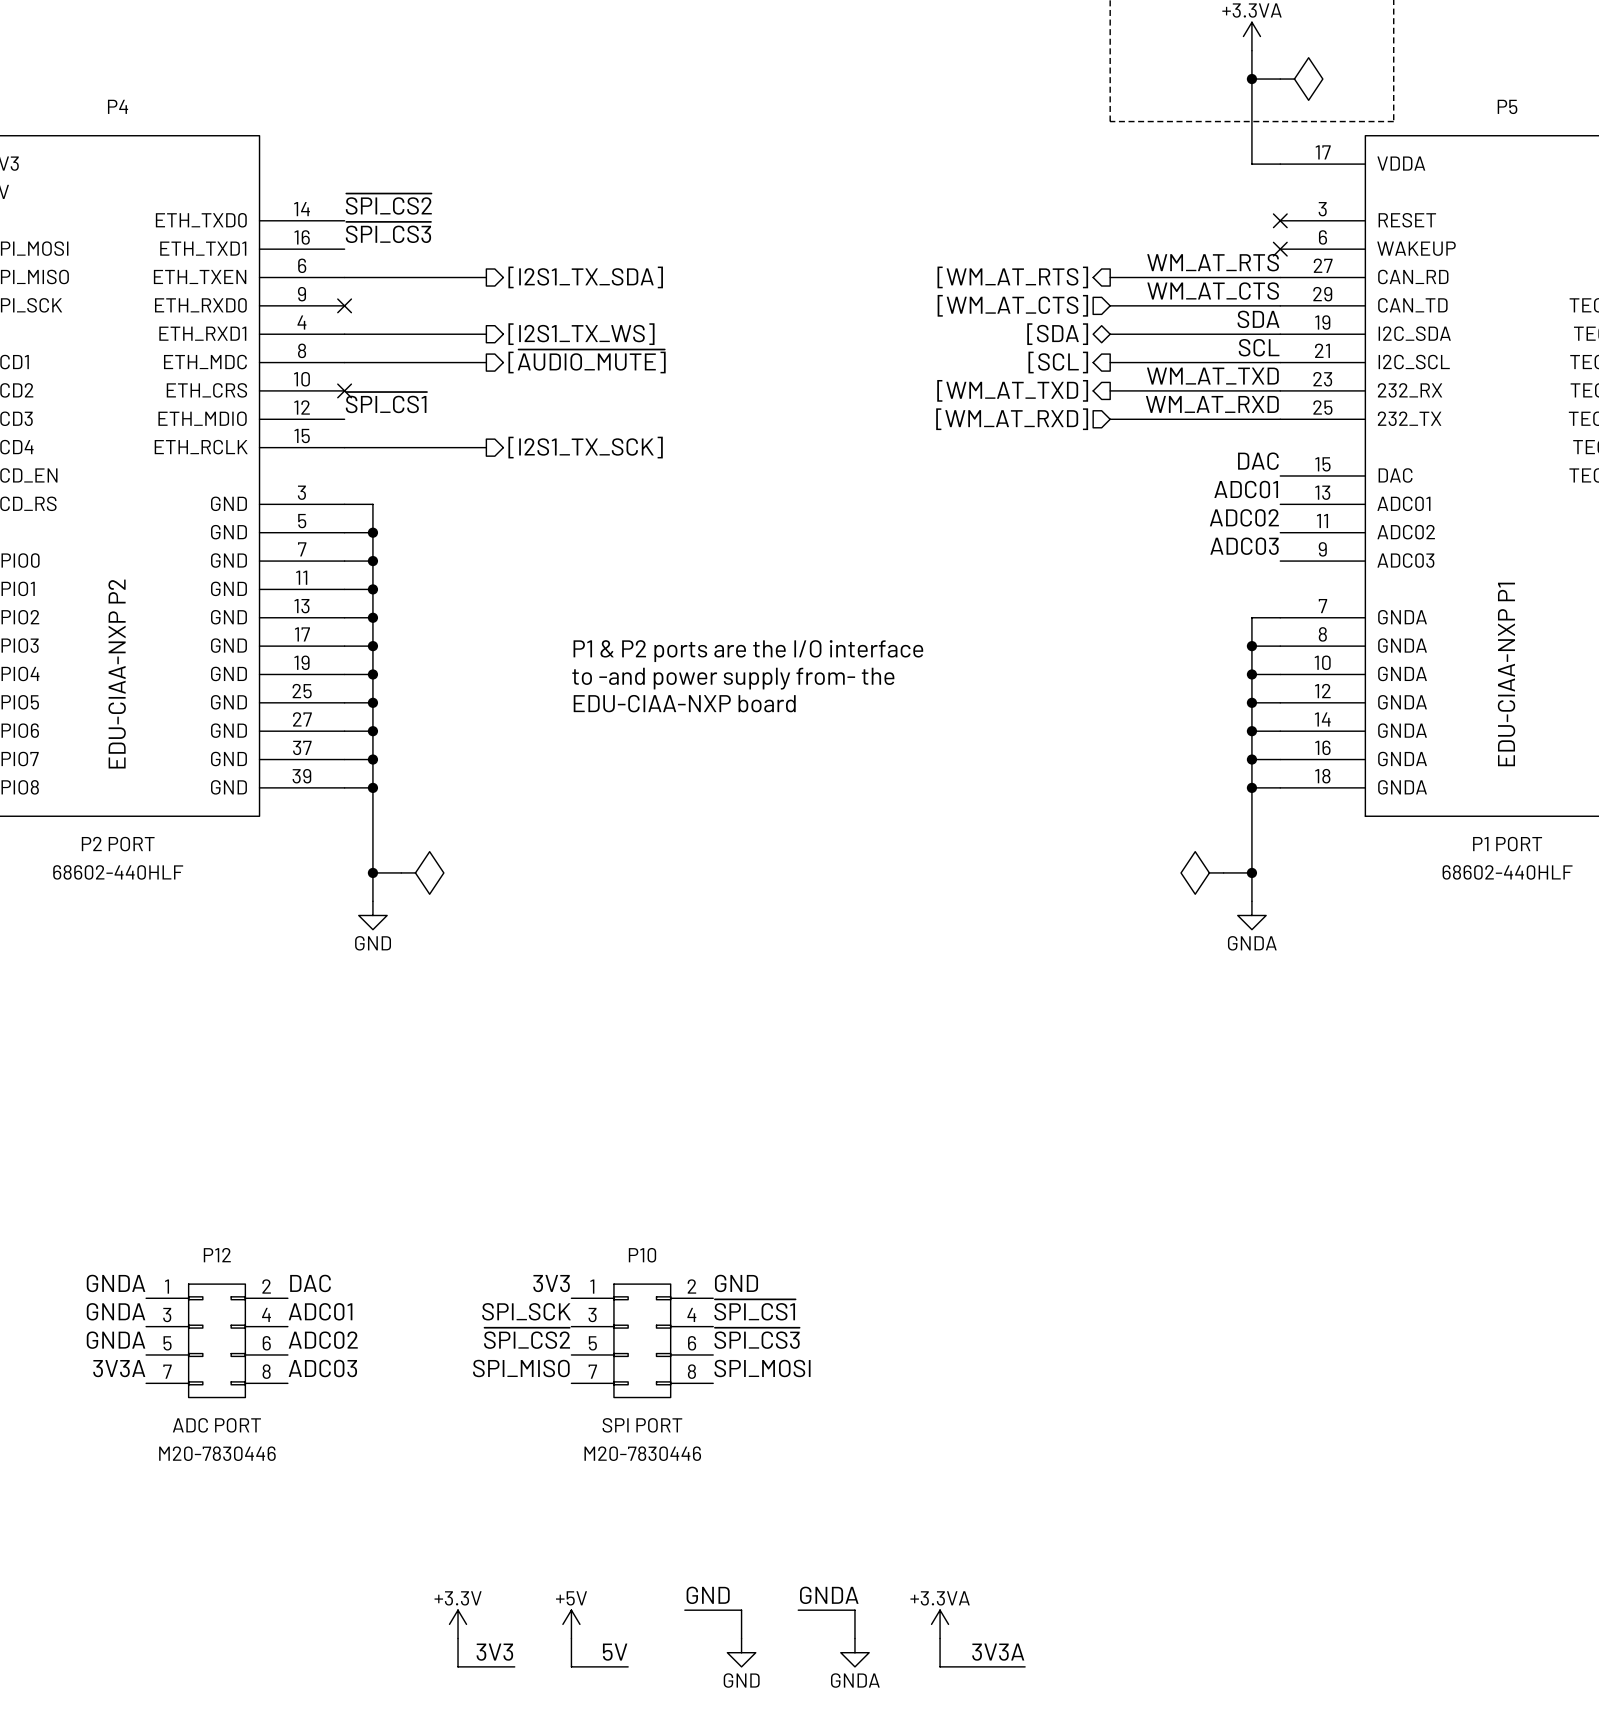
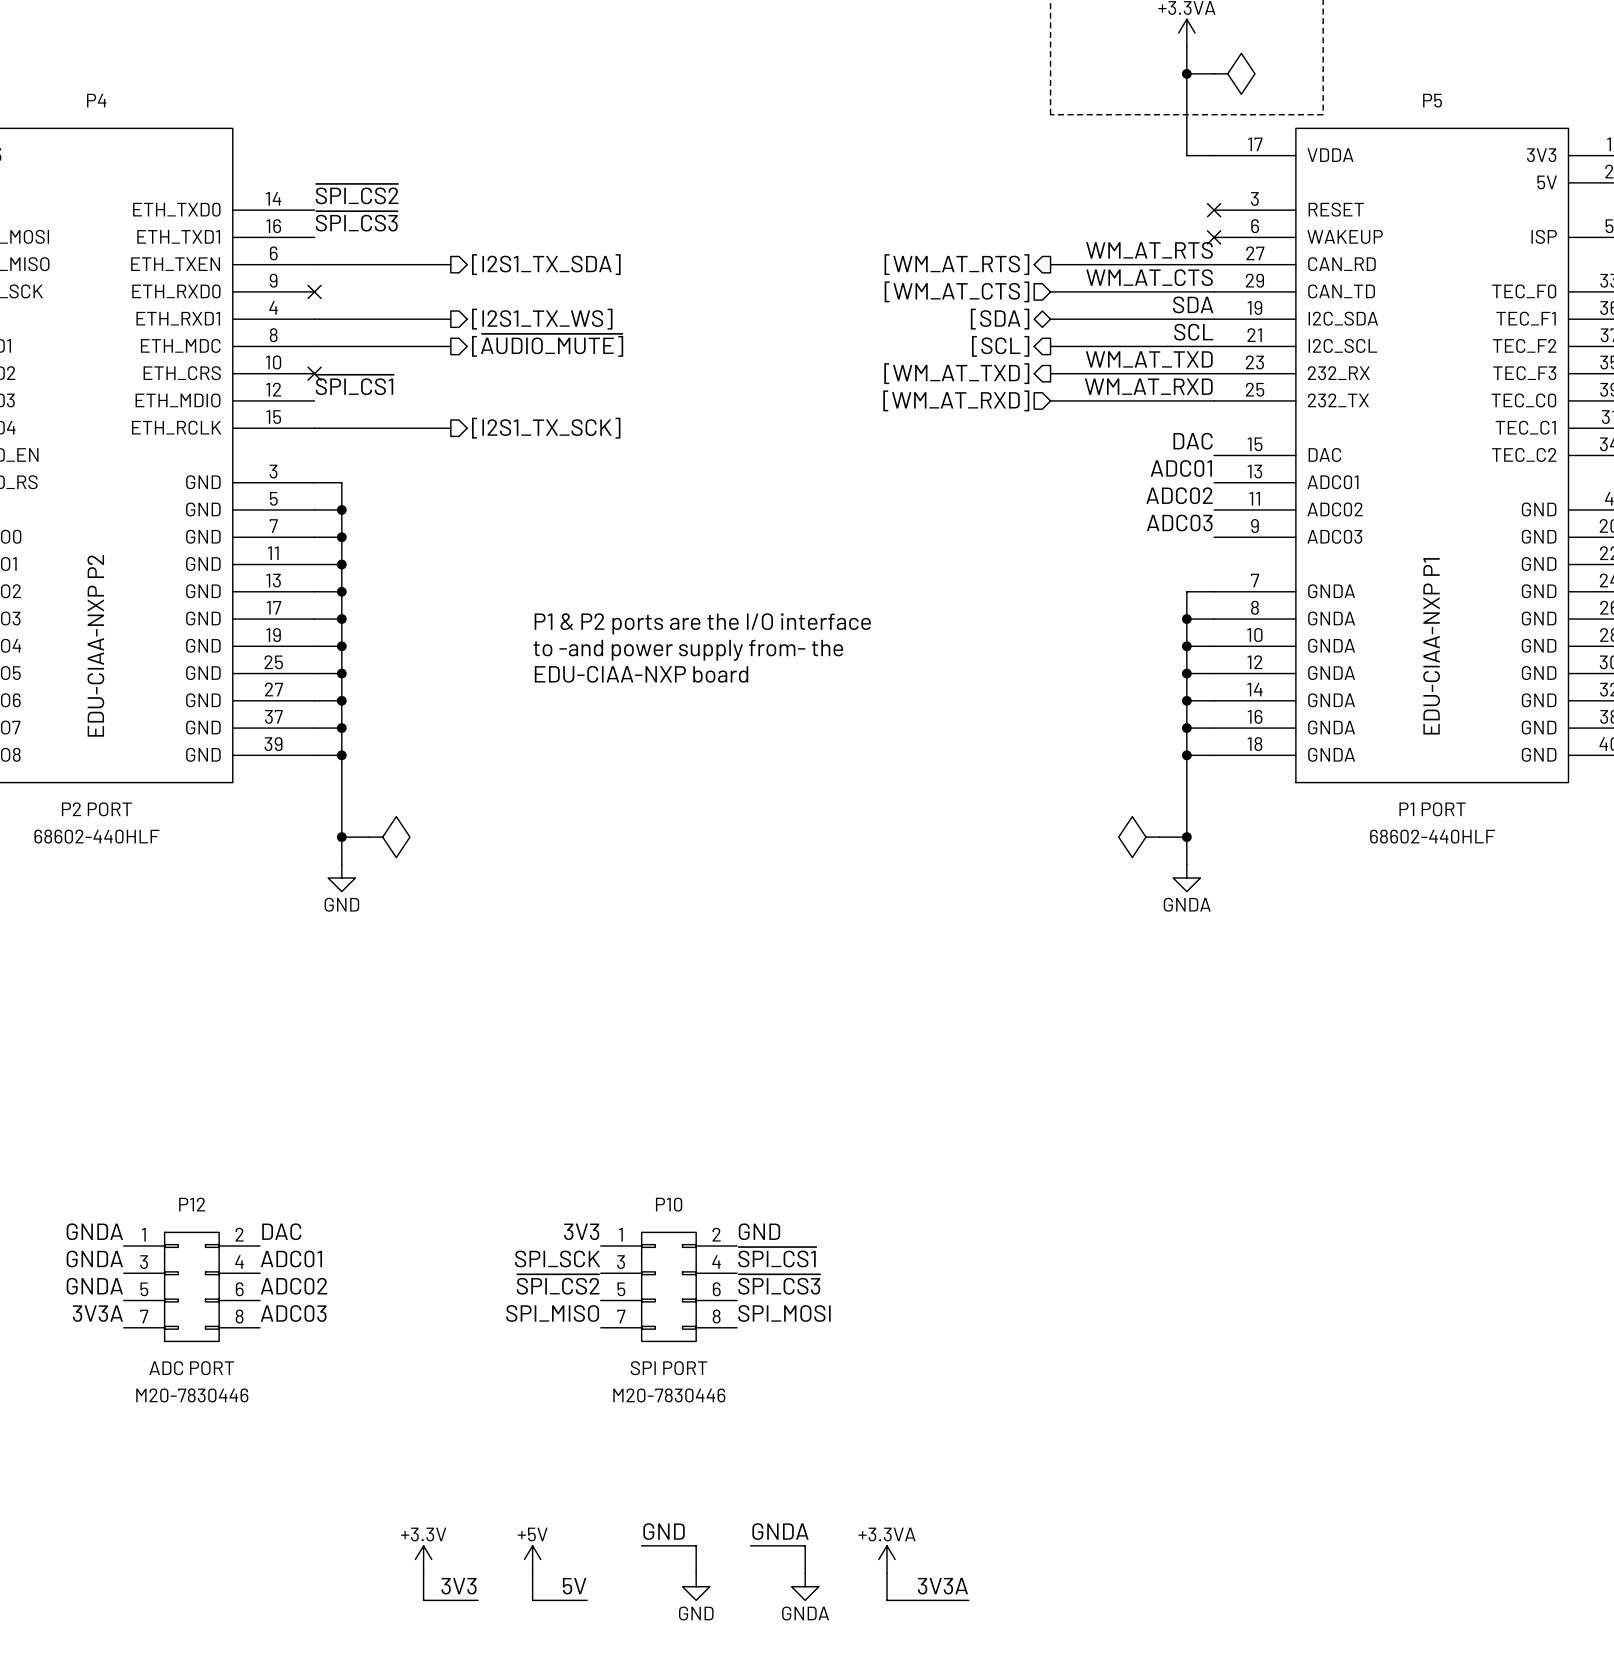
label position: 3V3 (551, 1283) -> 3V3 (581, 1231)
label position: GND (736, 1283) -> GND (759, 1231)
label position: ~{SPI_CS1} (755, 1309) -> ~{SPI_CS1} (777, 1257)
label position: SPI_SCK (526, 1311) -> SPI_SCK (557, 1259)
label position: ~{SPI_CS2} (527, 1338) -> ~{SPI_CS2} (558, 1284)
label position: ~{SPI_CS3} (757, 1338) -> ~{SPI_CS3} (779, 1284)
P10 position: (642, 1340) -> (668, 1286)
label position: SPI_MISO (521, 1368) -> SPI_MISO (552, 1313)
label position: SPI_MOSI (762, 1368) -> SPI_MOSI (784, 1313)

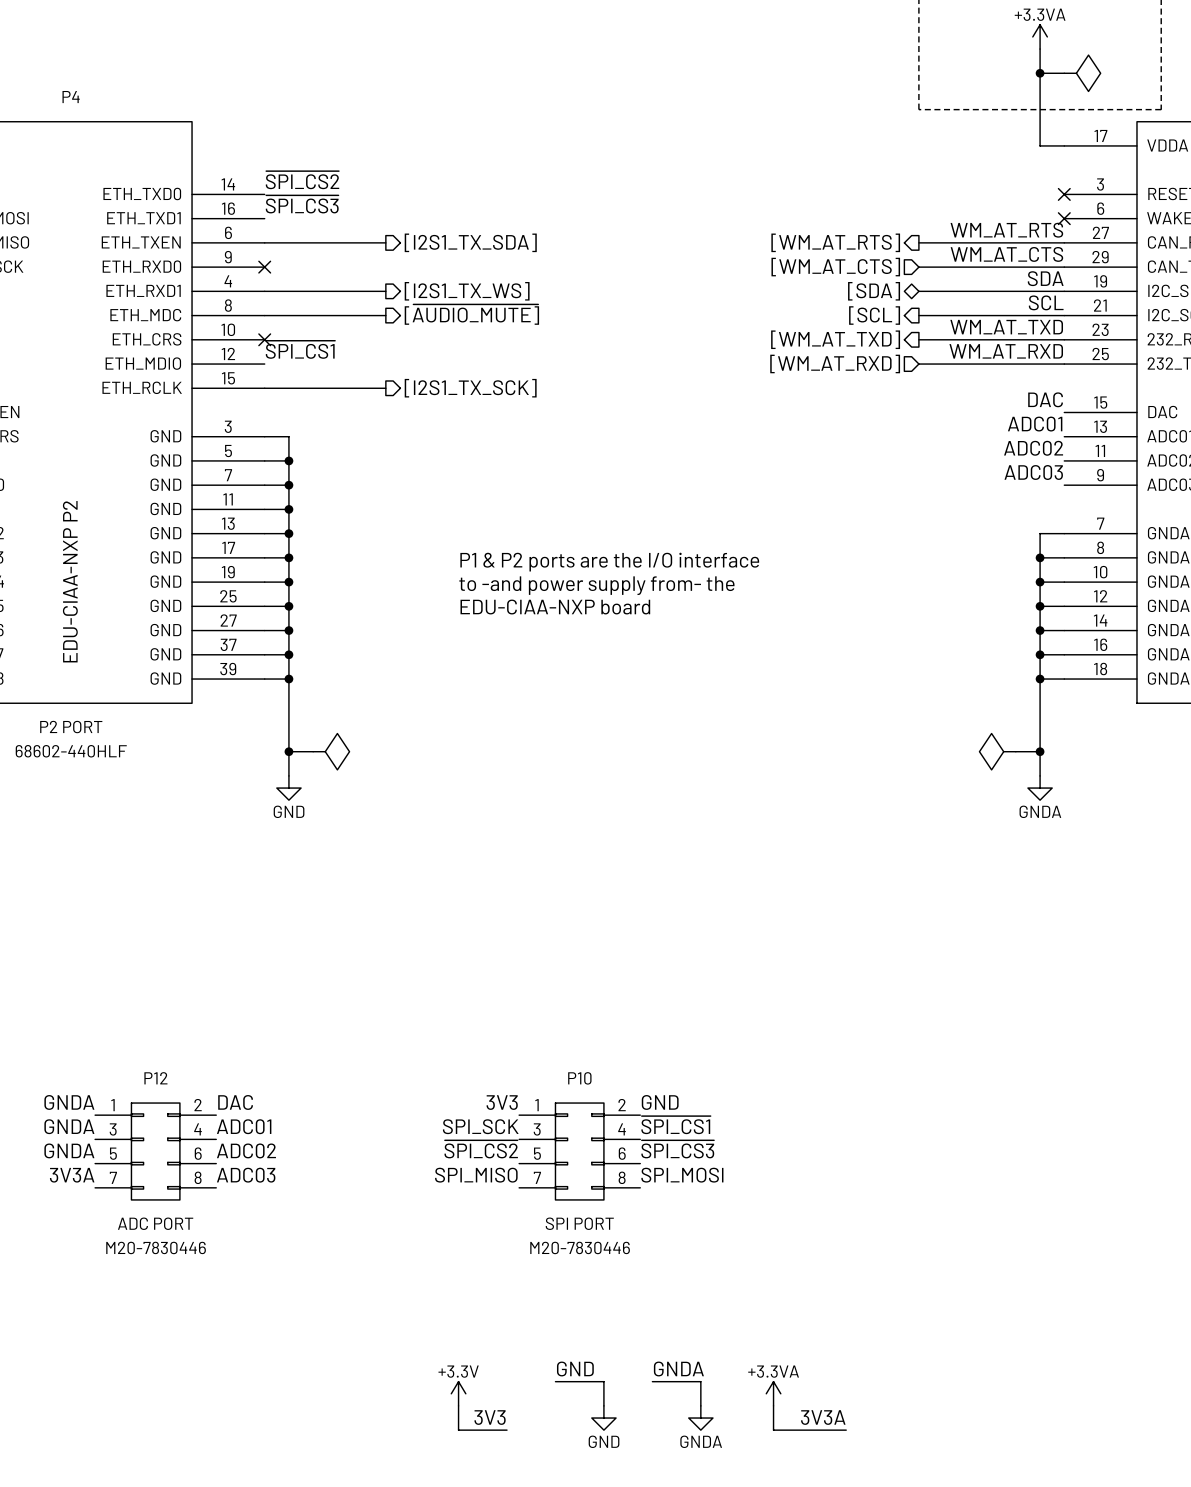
power symbol: +3.3V (423, 1559) -> none
power symbol: +5V (532, 1559) -> +3.3V (458, 1393)
wire: (423, 1573) (423, 1600) (478, 1600) -> none
label: 3V3 (459, 1586) -> none
label: 5V (574, 1586) -> 3V3 (490, 1417)

